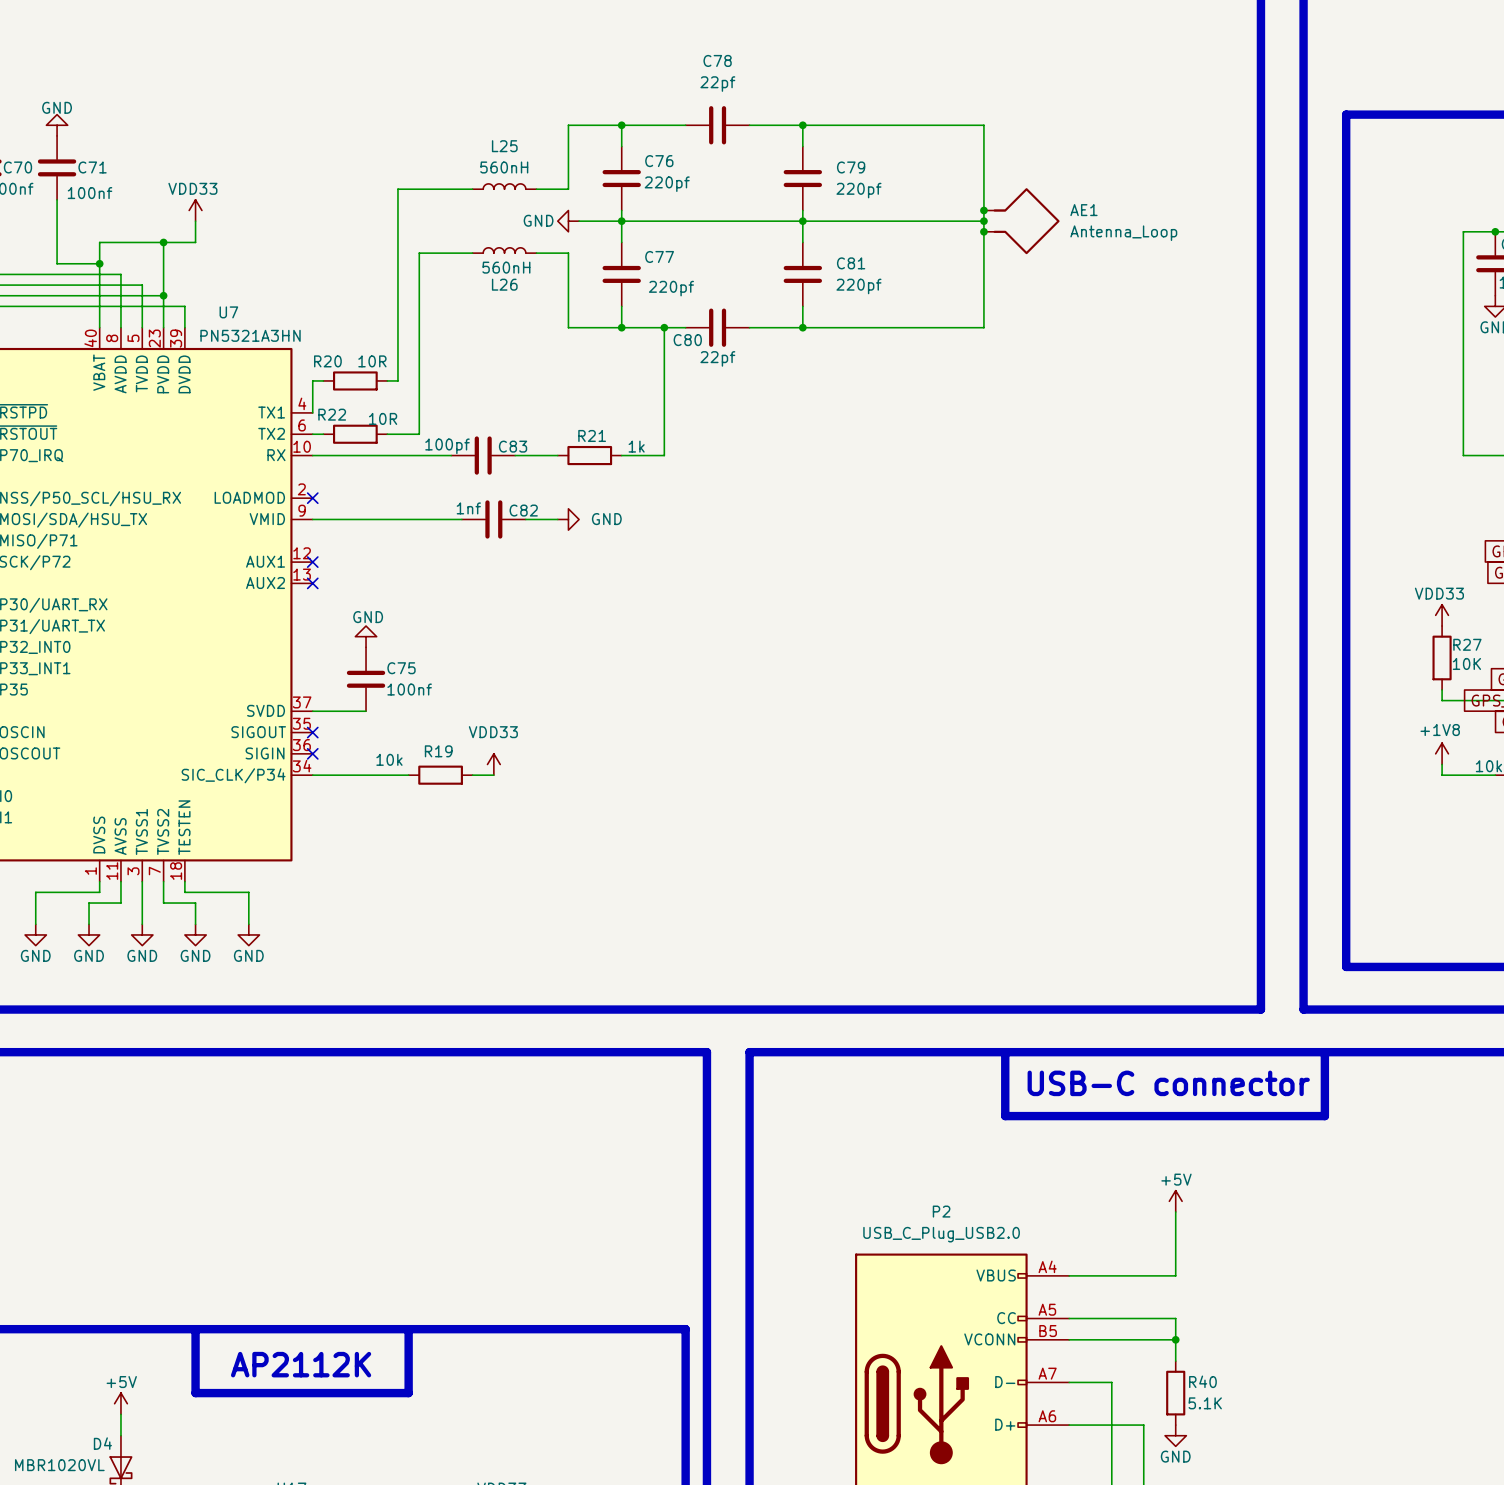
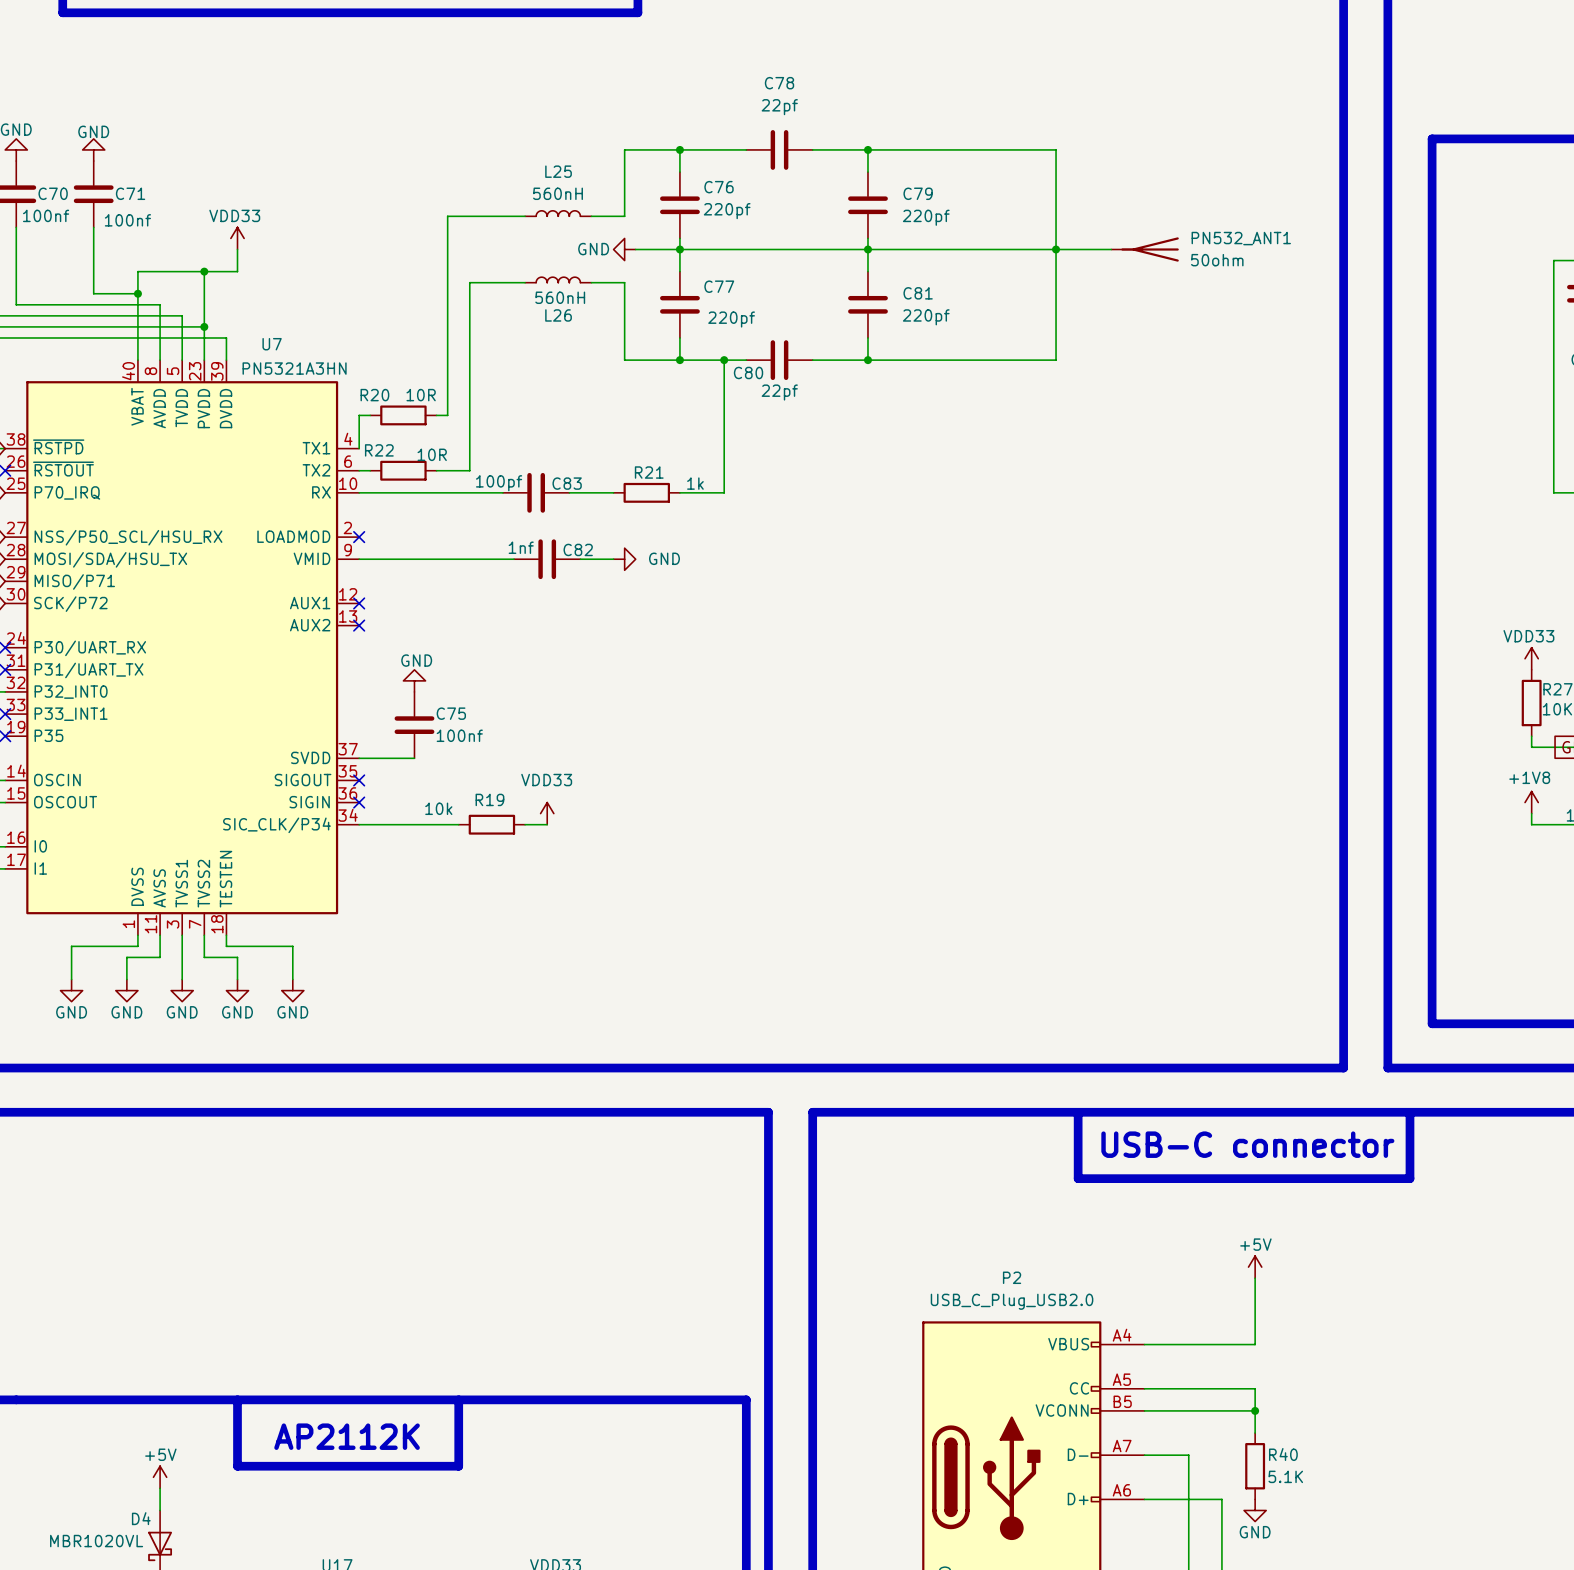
junction: (983, 210) -> none
wire: none -> (1056, 249) (1111, 249)
AE1: Antenna_Loop (1021, 221) -> none
PN532_ANT1: none -> 50ohm (1145, 249)
junction: (983, 231) -> none

